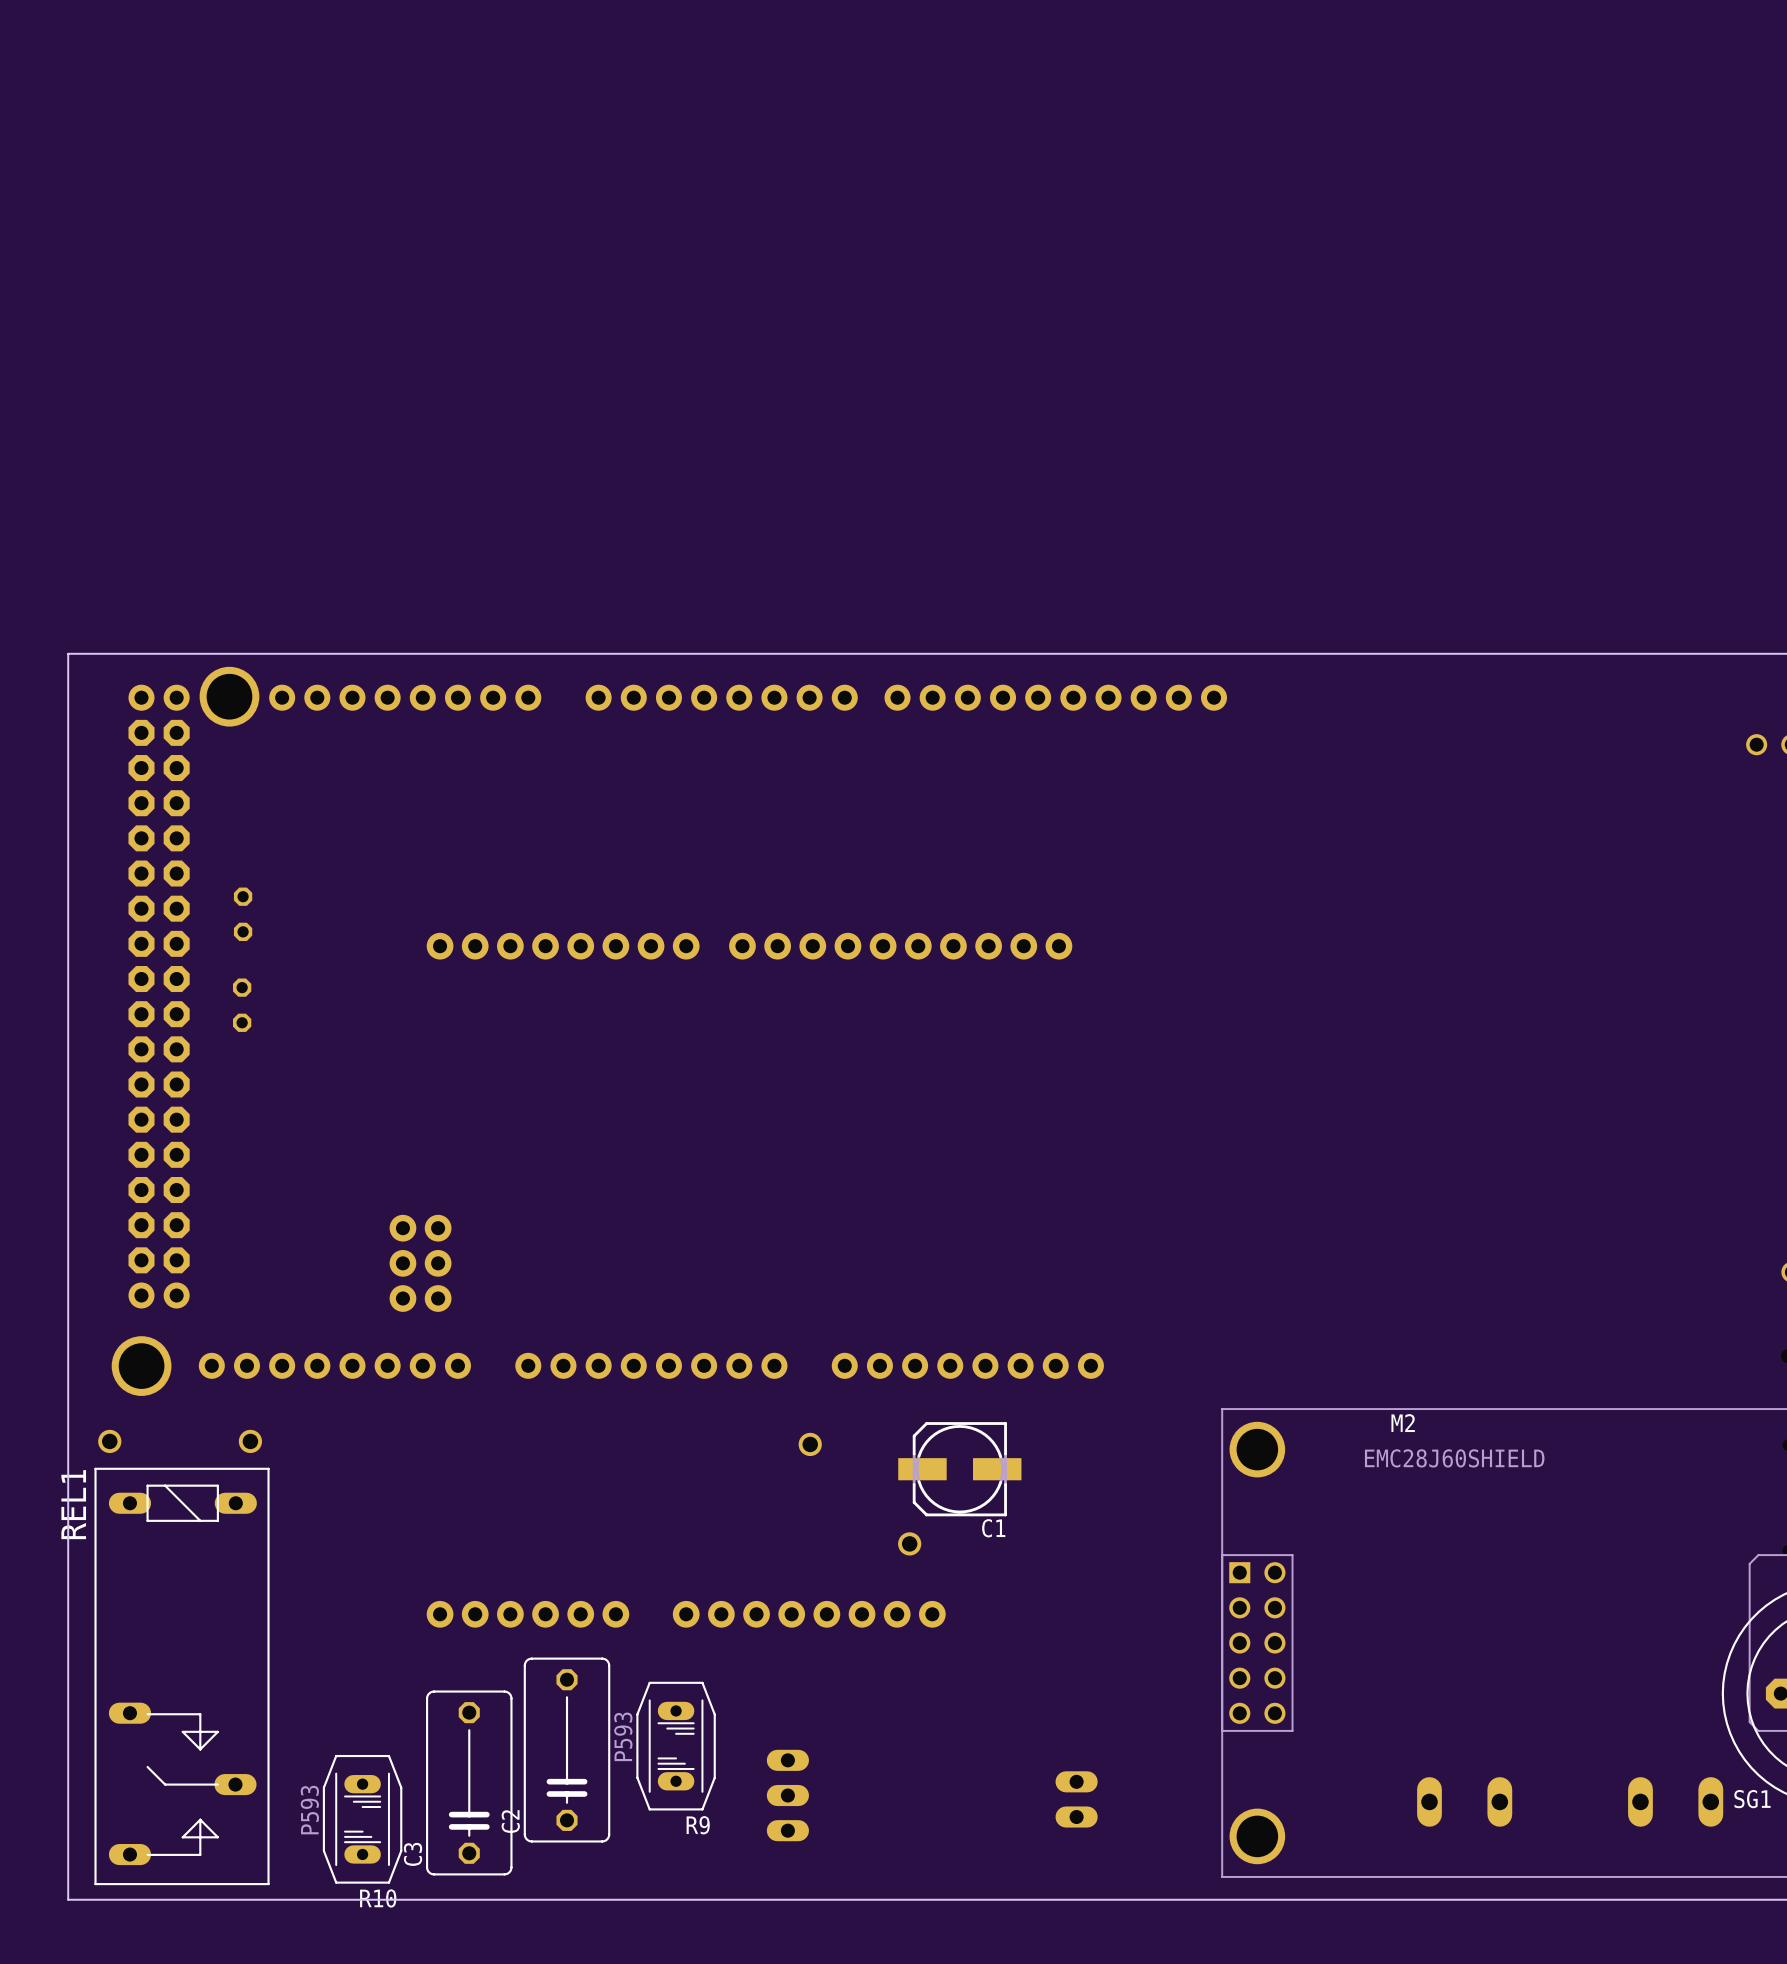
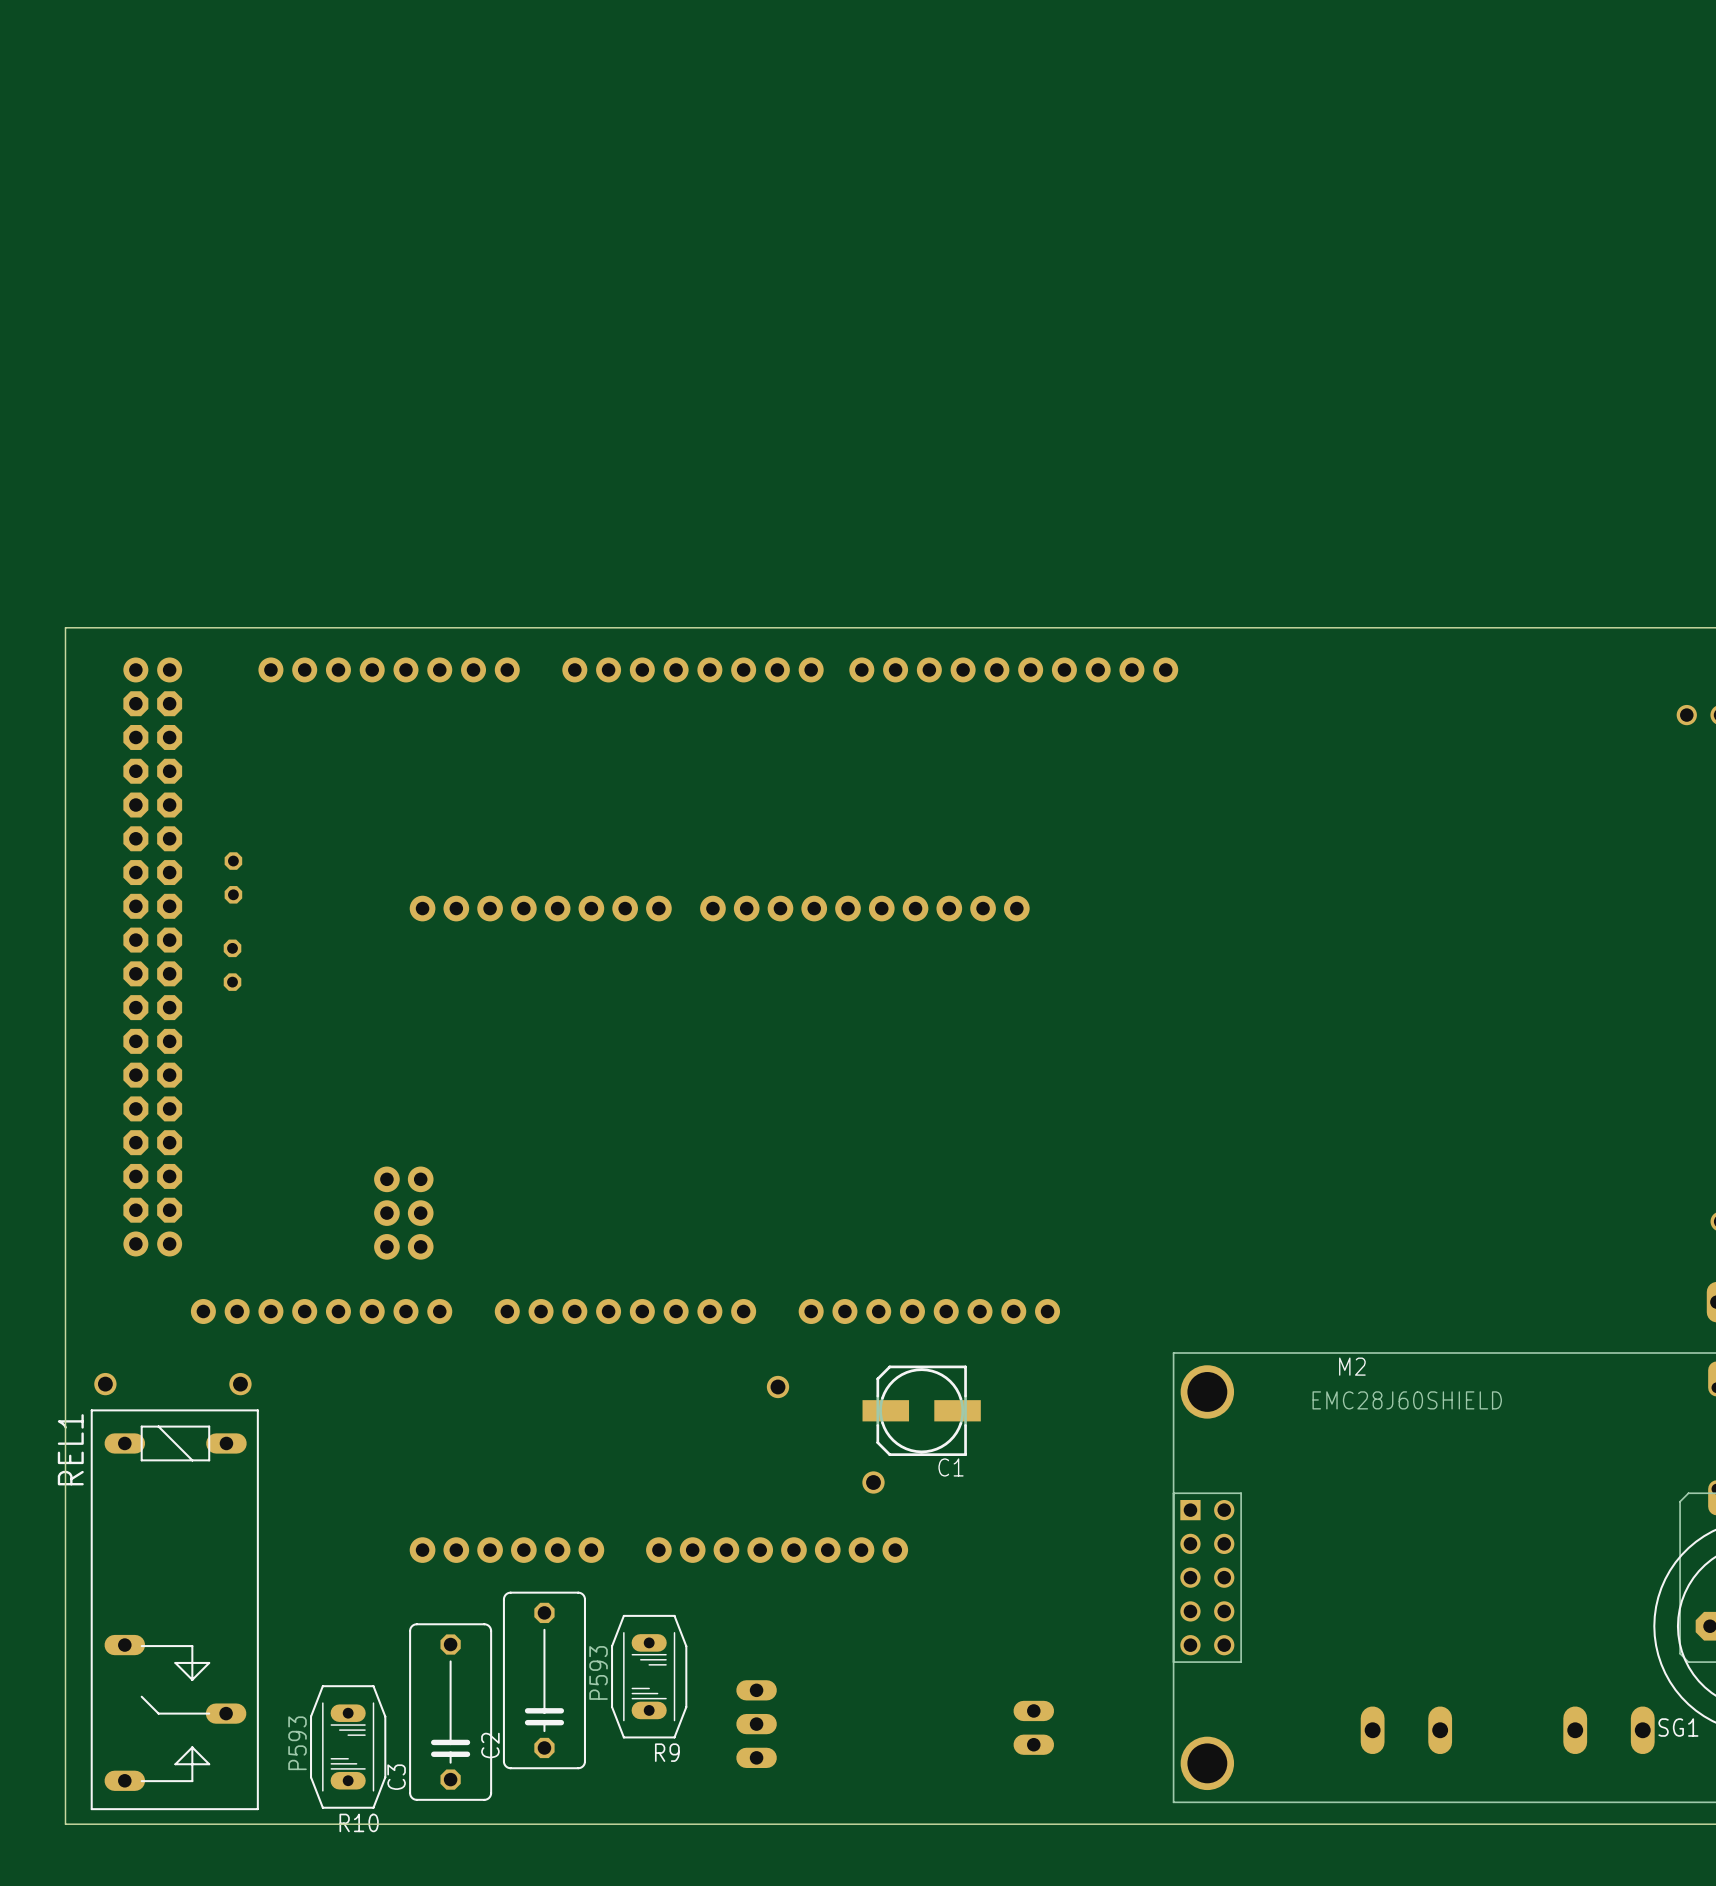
part: (229, 696) -> none
part: (141, 1366) -> none

